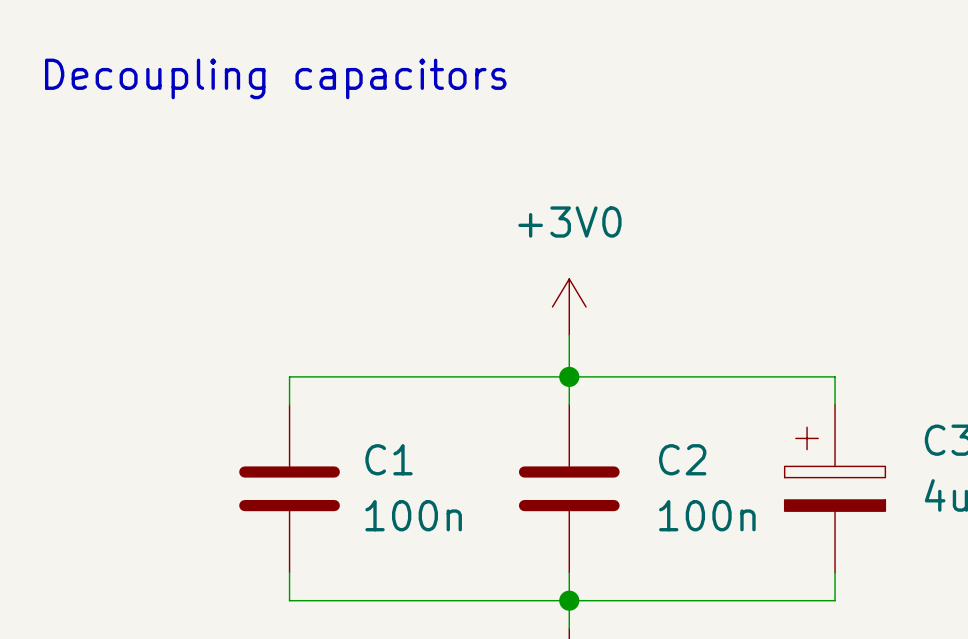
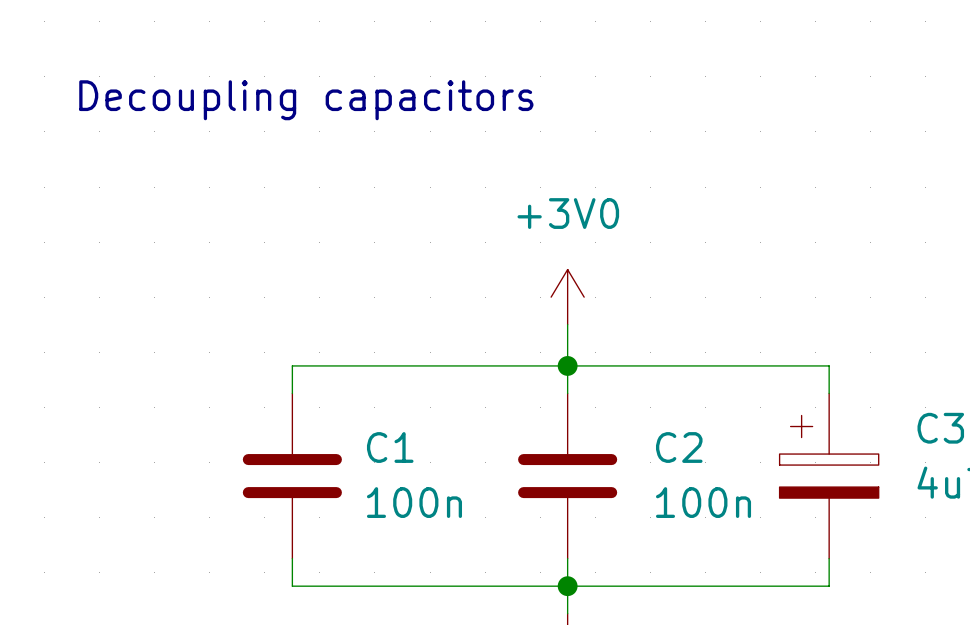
text position: Decoupling capacitors (275, 78) -> Decoupling capacitors (306, 100)

